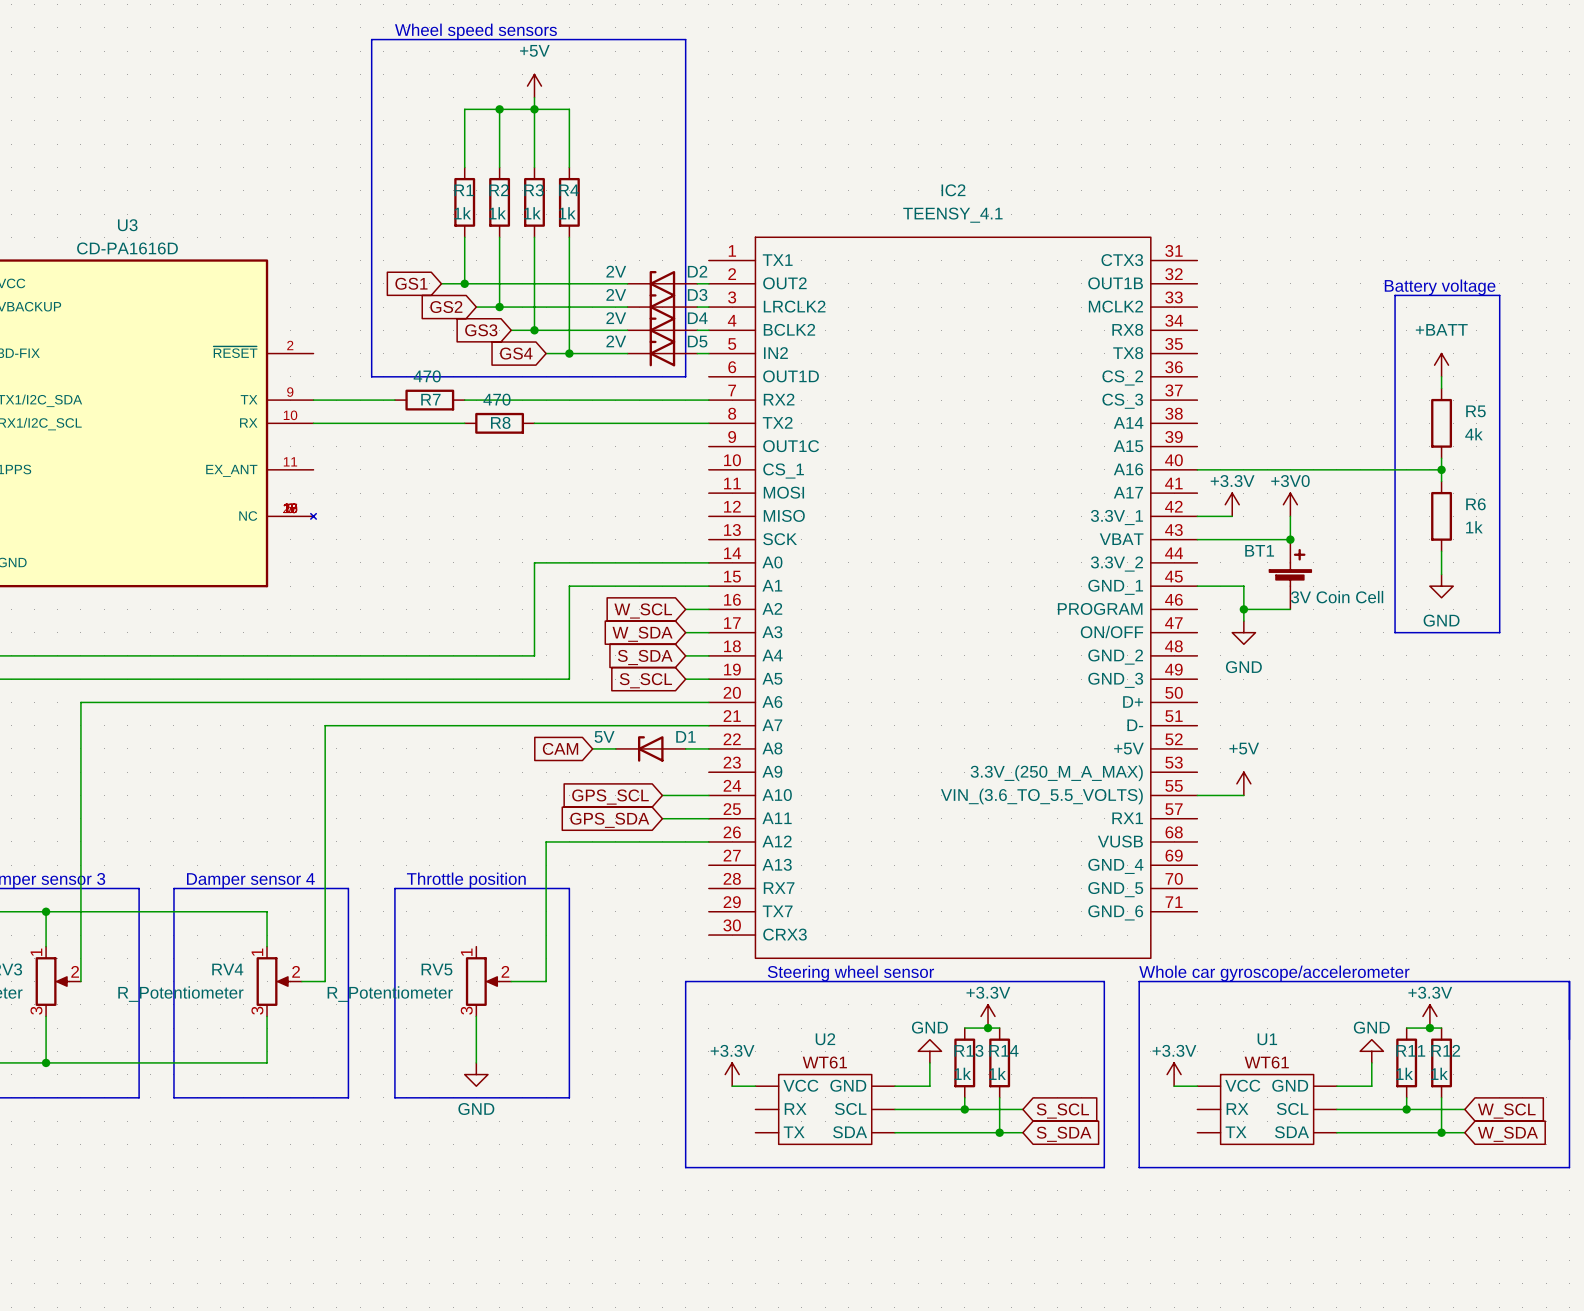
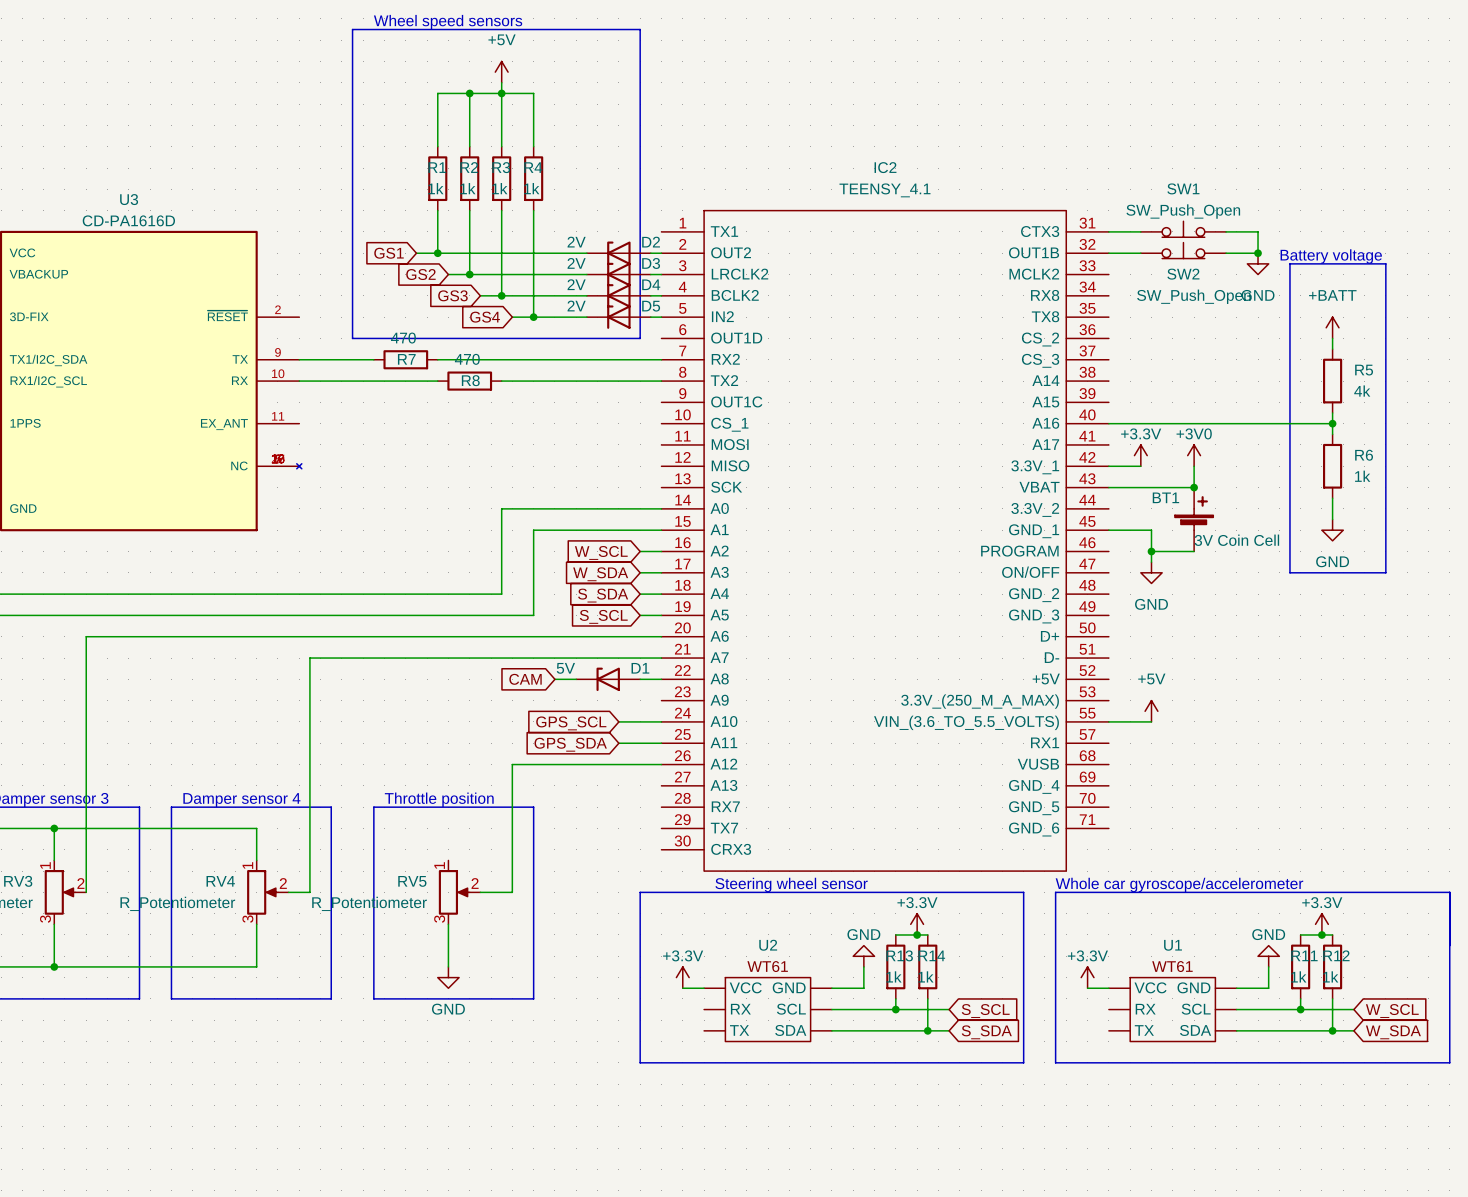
SW1: none -> SW_Push_Open (1183, 229)
wire: none -> (1108, 231) (1140, 231)
wire: none -> (1226, 231) (1258, 231) (1258, 253) (1226, 253)
SW2: none -> SW_Push_Open (1183, 250)
wire: none -> (1108, 253) (1140, 253)
junction: none -> (1258, 253)
power symbol: none -> GND (1258, 263)

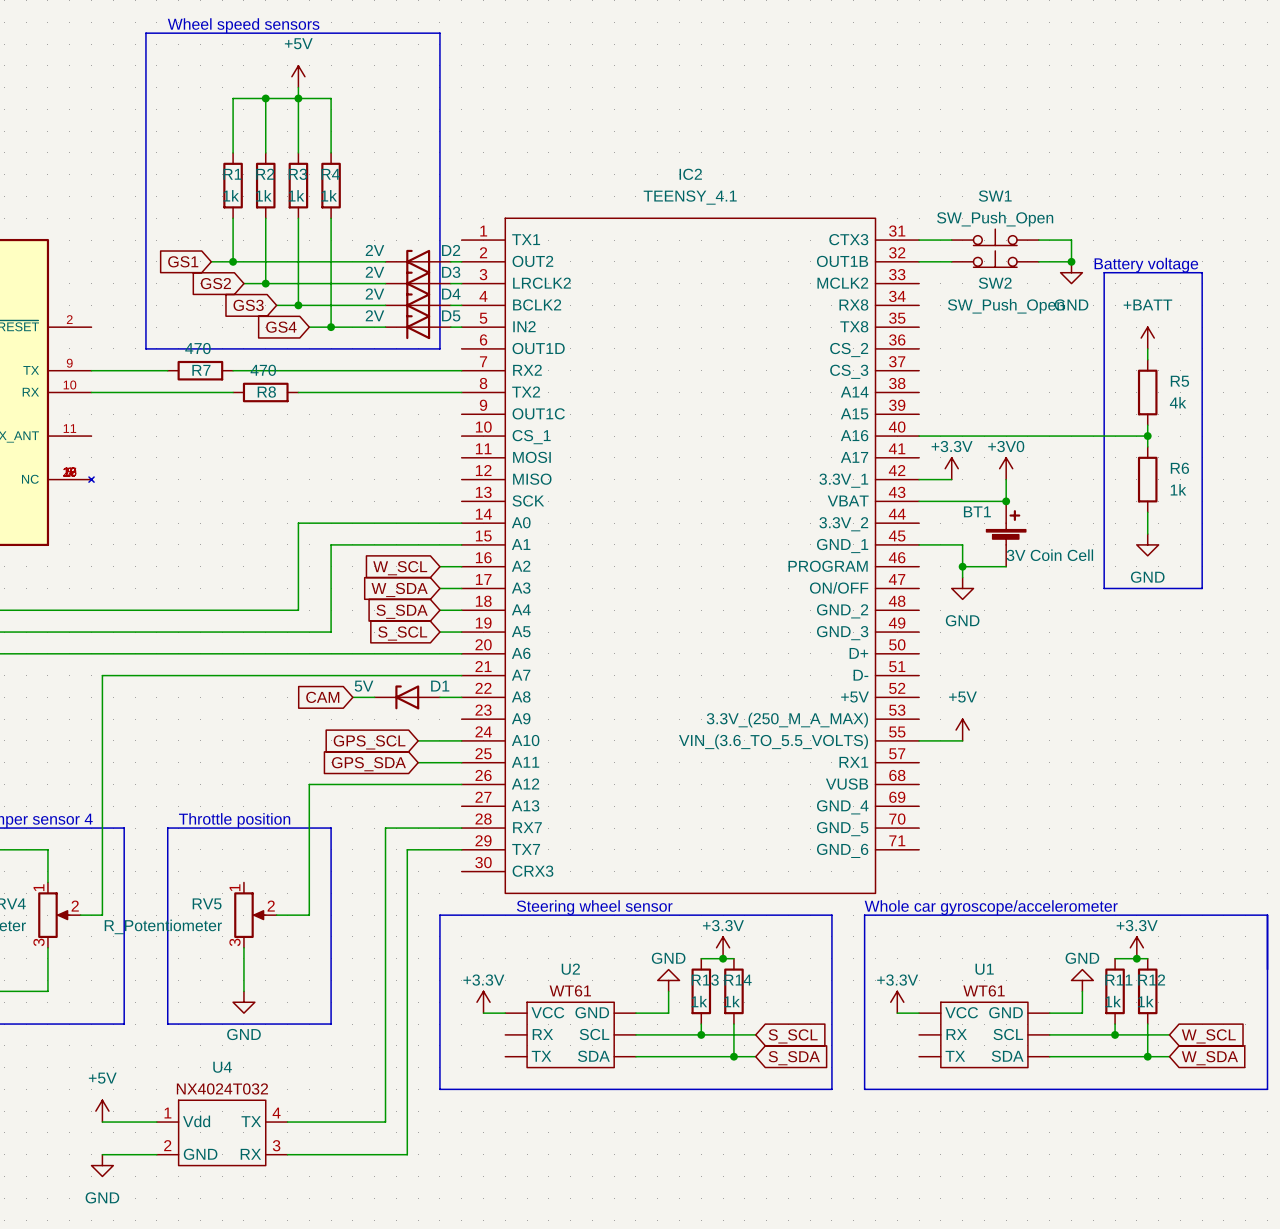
wire: none -> (461, 828) (385, 828) (385, 1122) (287, 1122)
wire: none -> (461, 849) (407, 849) (407, 1154) (287, 1154)
power symbol: none -> +5V (102, 1111)
wire: none -> (102, 1122) (156, 1122)
U4: none -> (222, 1132)
wire: none -> (102, 1154) (156, 1154)
power symbol: none -> GND (102, 1165)

